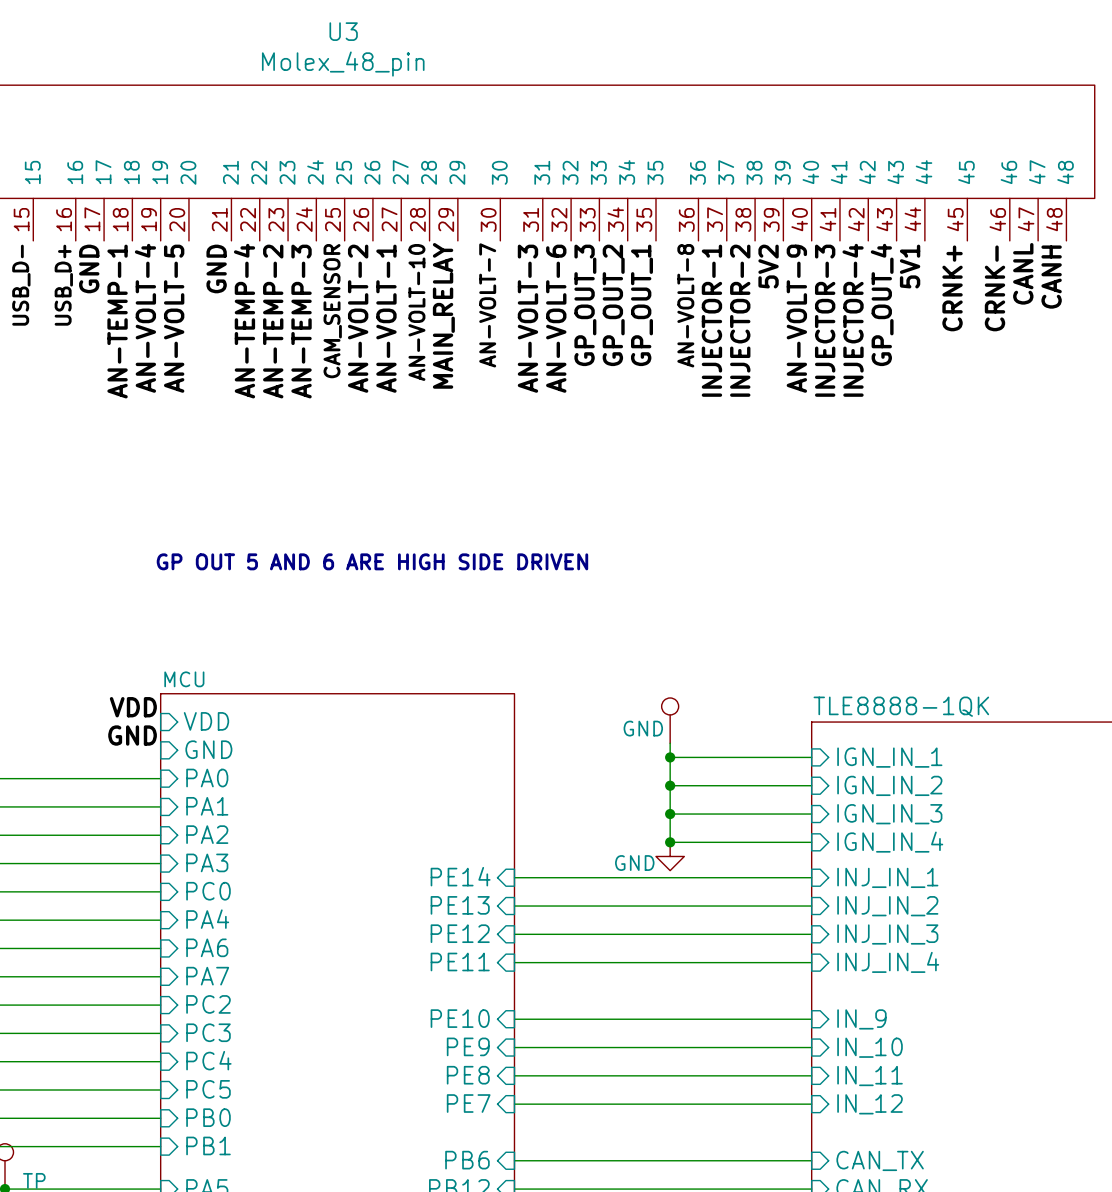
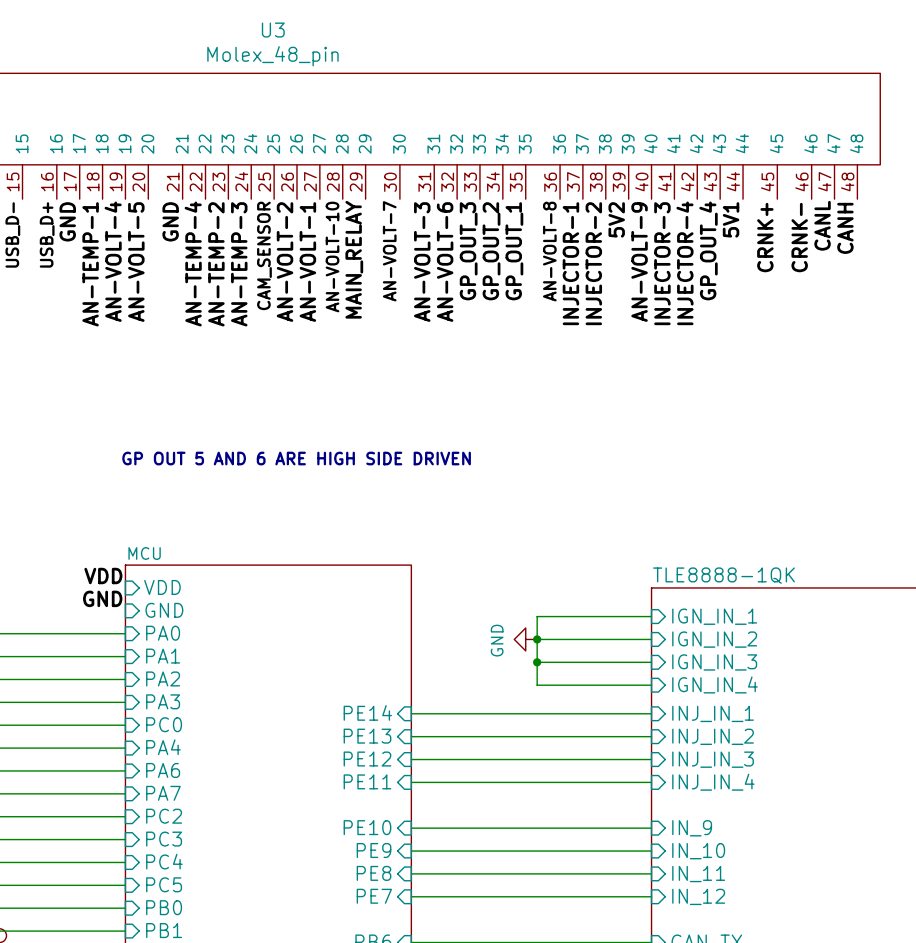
part: GND (670, 720) -> none
wire: (670, 743) (670, 757) -> none
junction: (670, 757) -> none
junction: (670, 842) -> none
power symbol rotation: 0° (670, 856) -> 90° clockwise (525, 639)
power symbol position: GND (670, 856) -> GND (525, 639)

